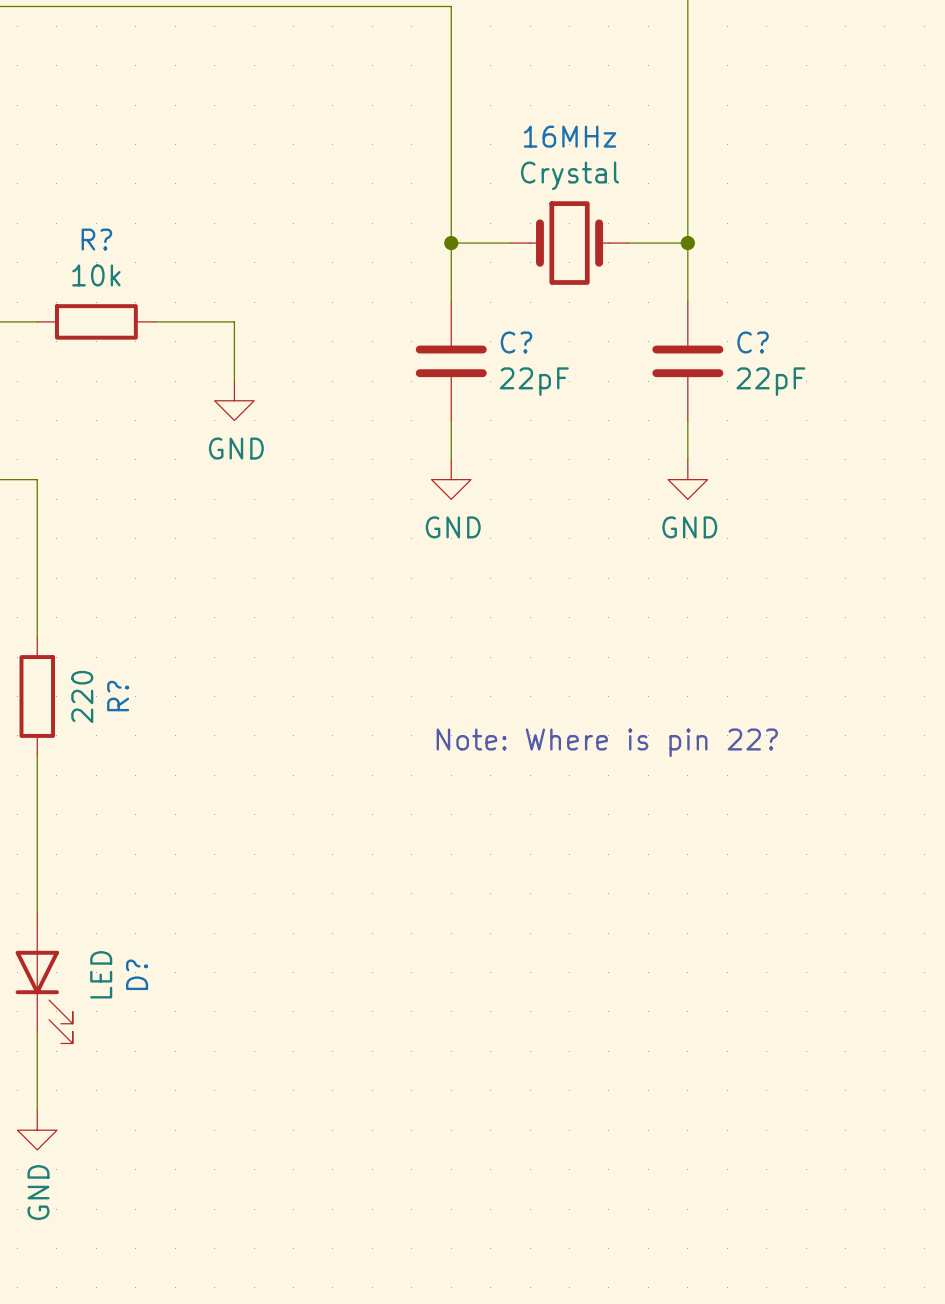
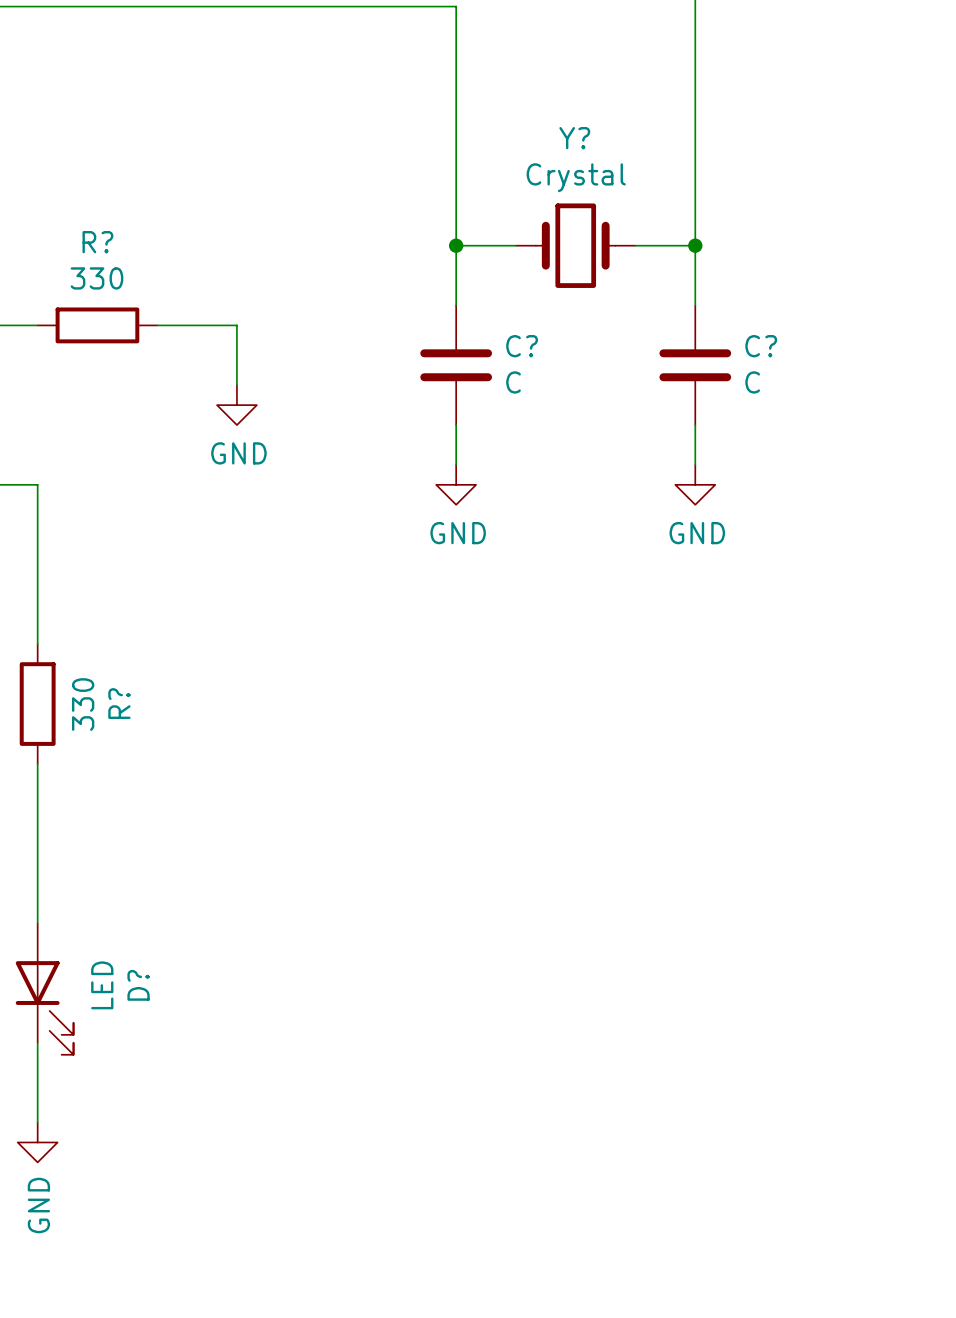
16MHz name: 16MHz (570, 136) -> Y? (574, 138)
R? value: 10k (96, 275) -> 330 (96, 278)
C? value: 22pF (534, 381) -> C (513, 382)
C? value: 22pF (770, 381) -> C (752, 382)
R? value: 220 (82, 696) -> 330 (83, 704)
text: Note: Where is pin 22? (607, 742) -> none

